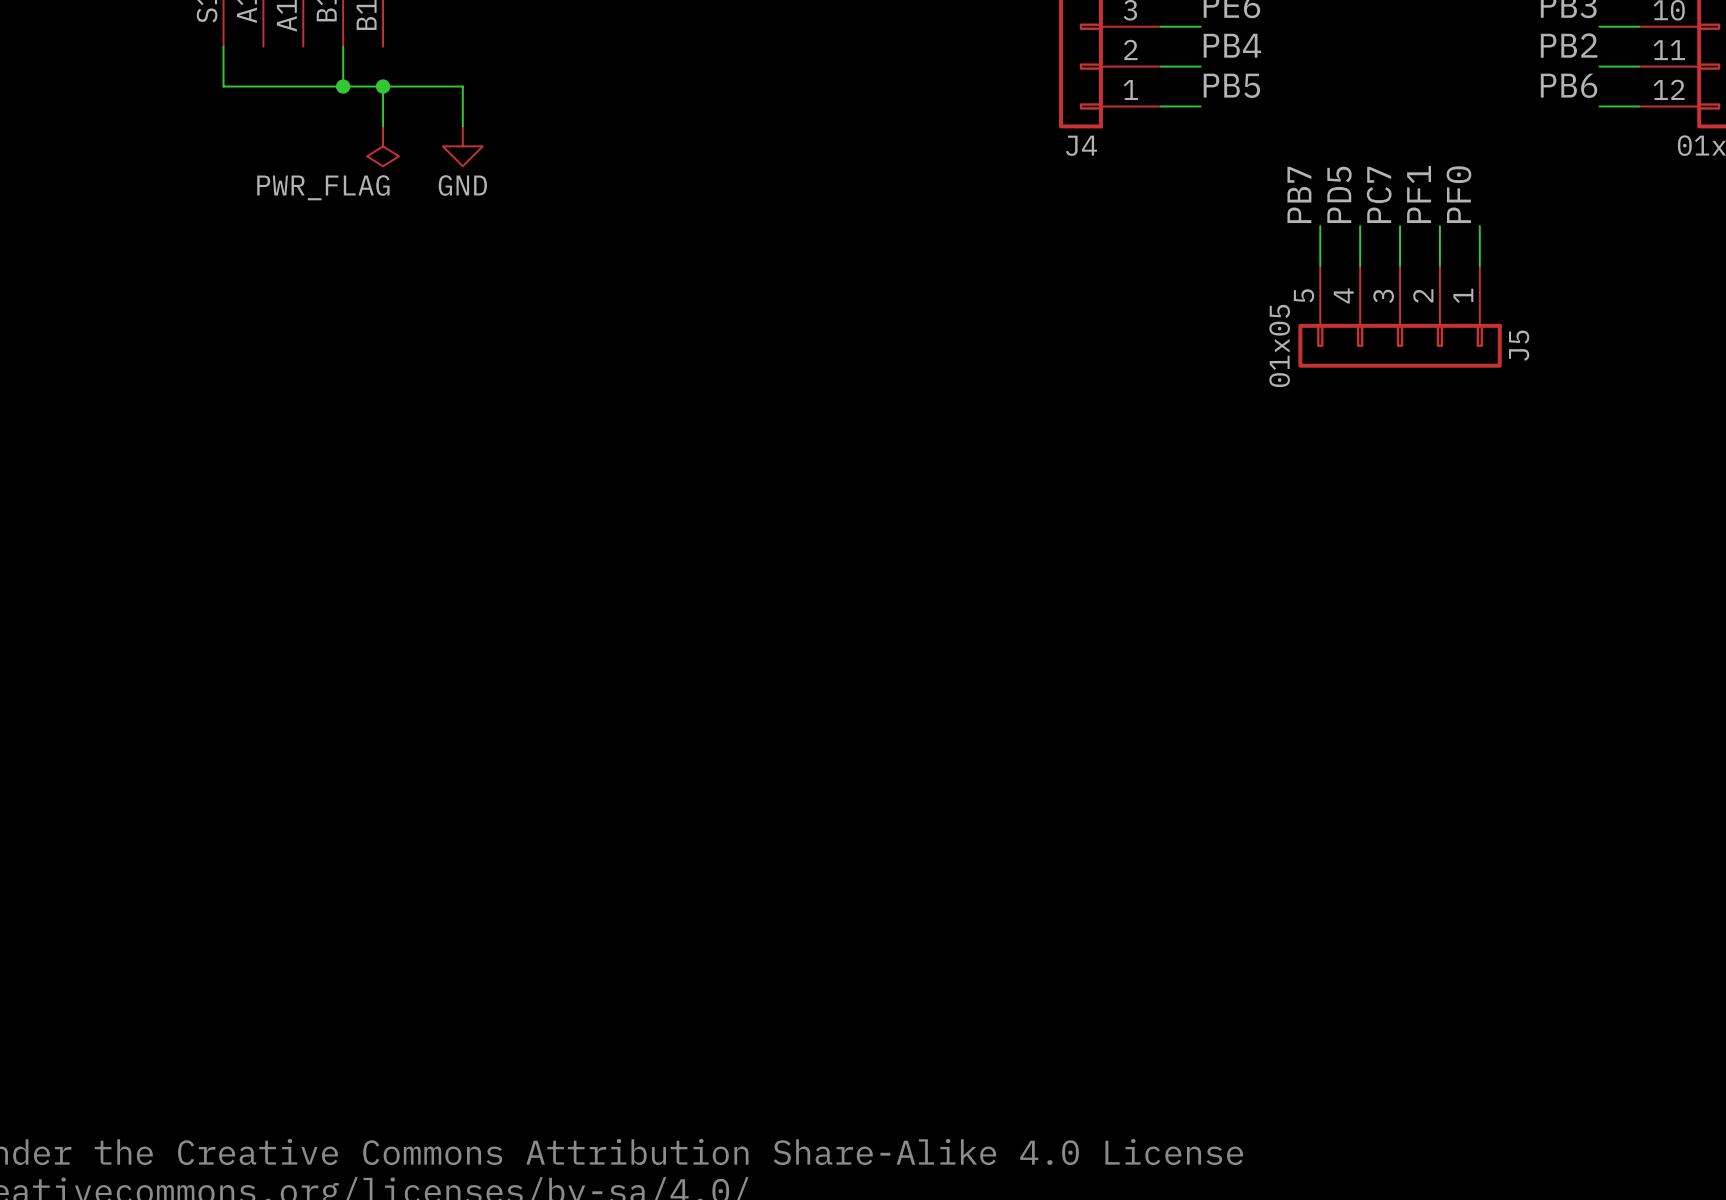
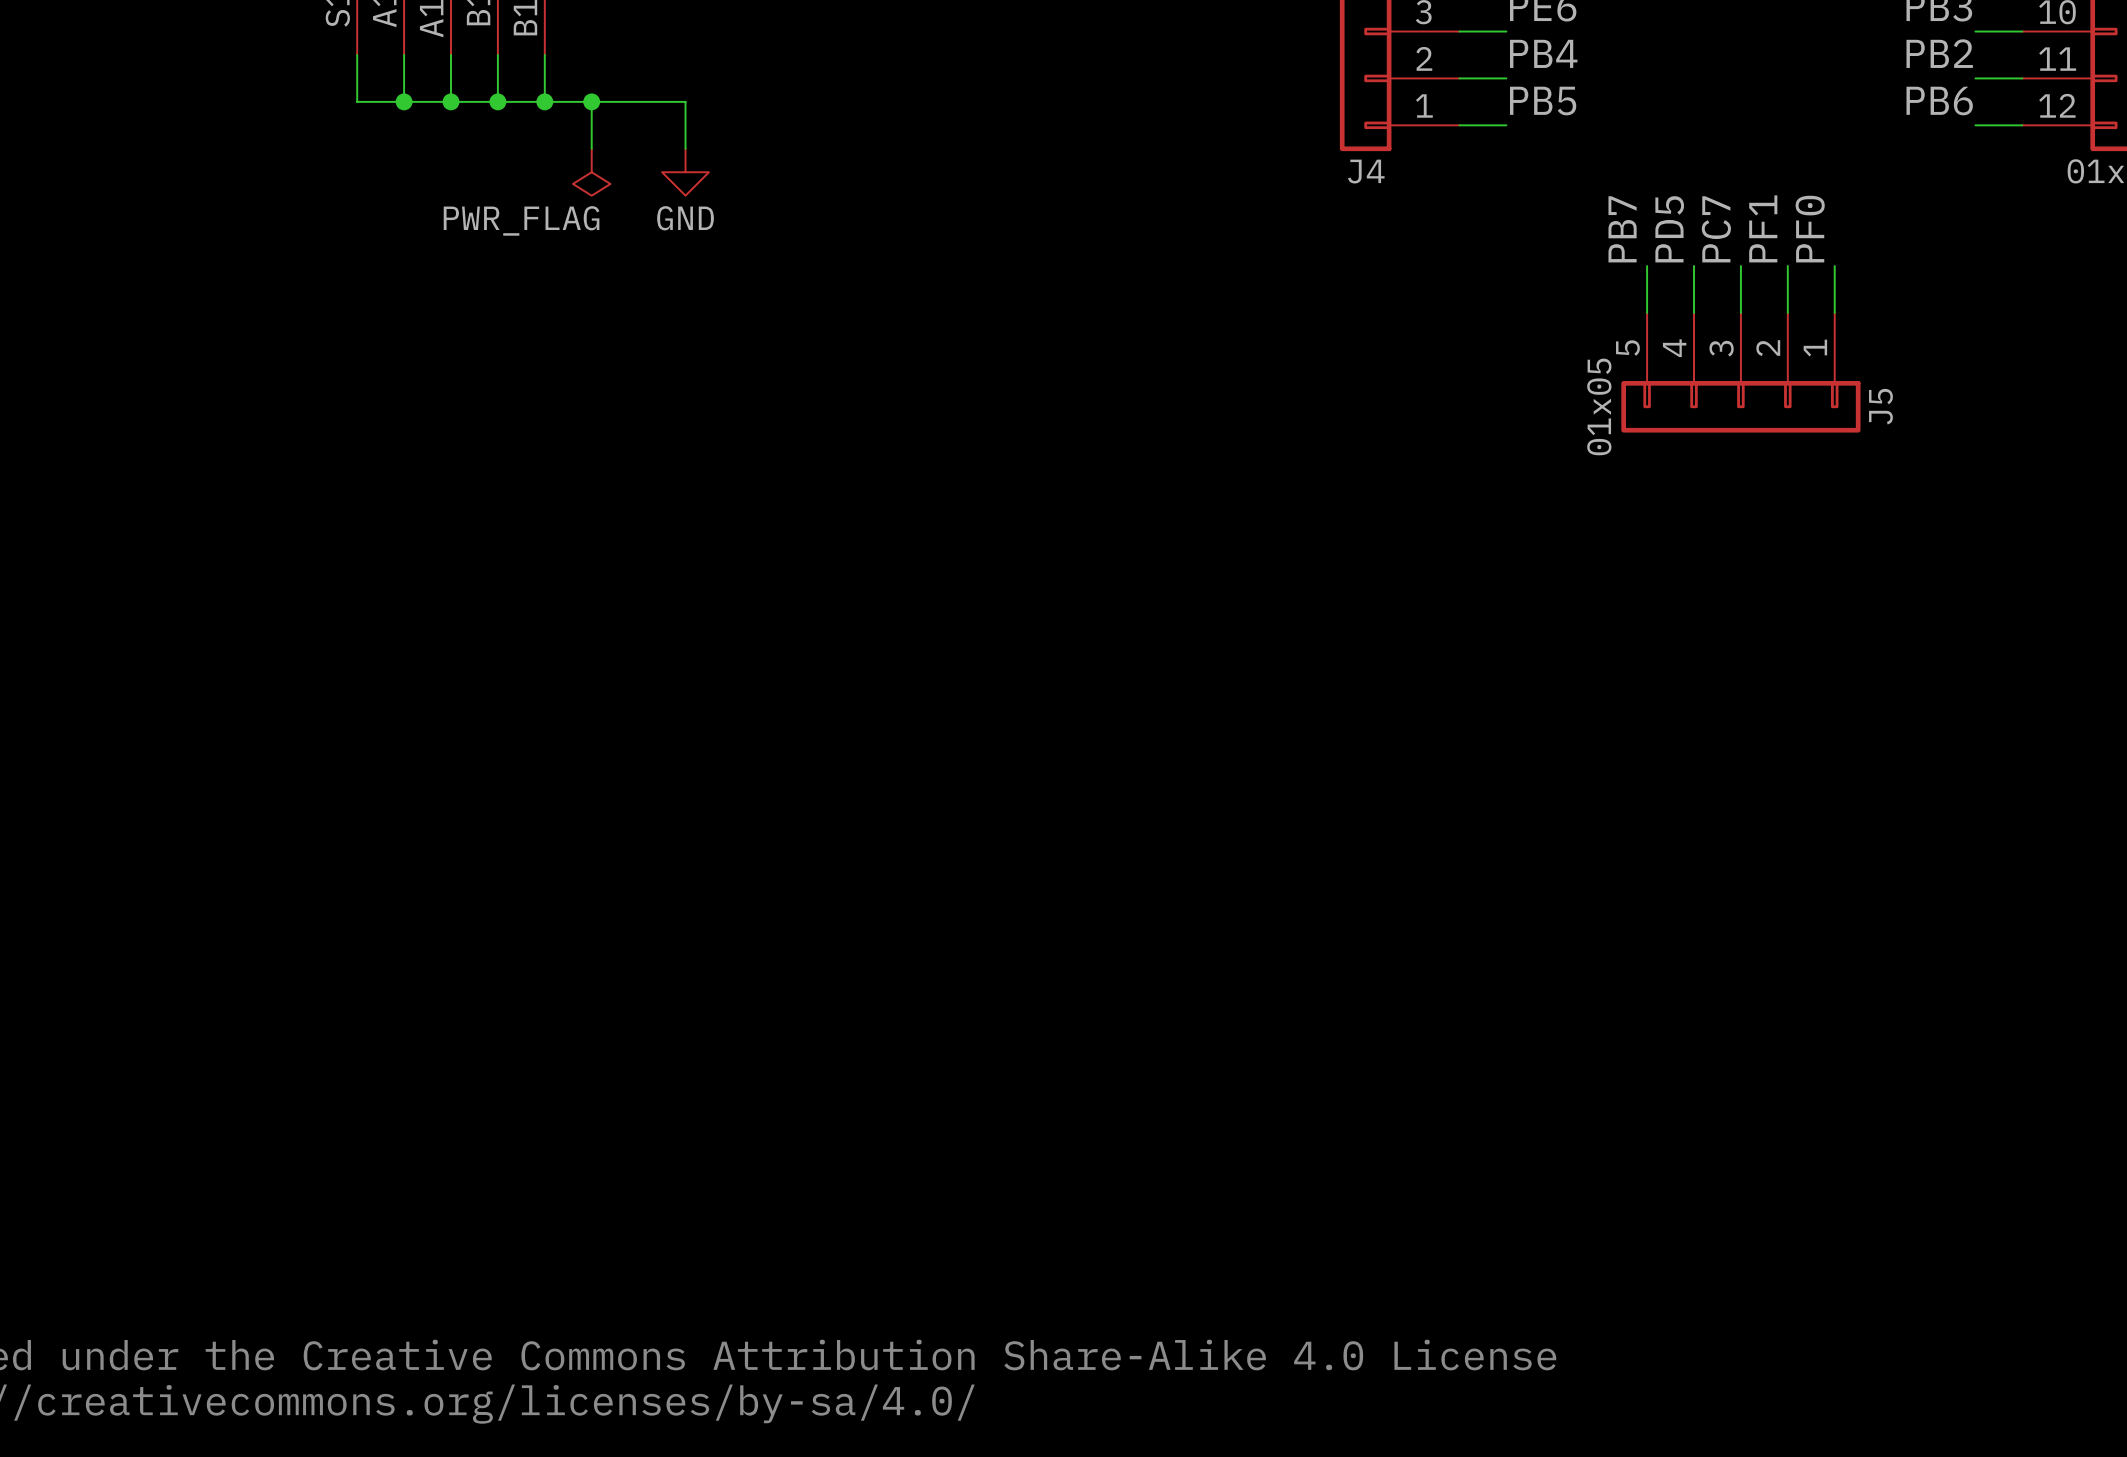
wire: none -> (404, 54) (404, 101)
wire: none -> (451, 54) (451, 101)
junction: none -> (404, 101)
junction: none -> (451, 101)
wire: (383, 86) (383, 126) -> (544, 101) (544, 54)
wire: none -> (591, 101) (591, 148)
junction: none -> (591, 101)
wire: (462, 86) (462, 126) -> (638, 101) (685, 101) (685, 148)
power symbol position: PWR_FLAG (383, 146) -> PWR_FLAG (591, 172)
power symbol position: GND (462, 146) -> GND (685, 172)

